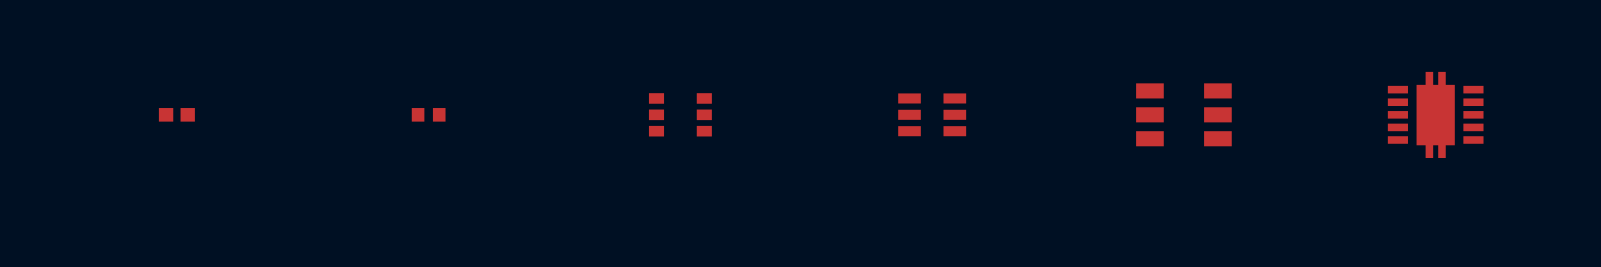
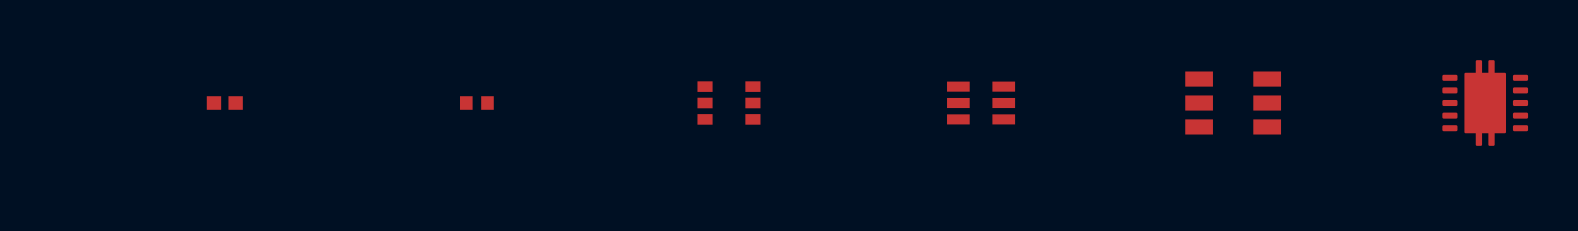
part footprint: [1387, 71, 1484, 158] -> [1442, 60, 1529, 146]

